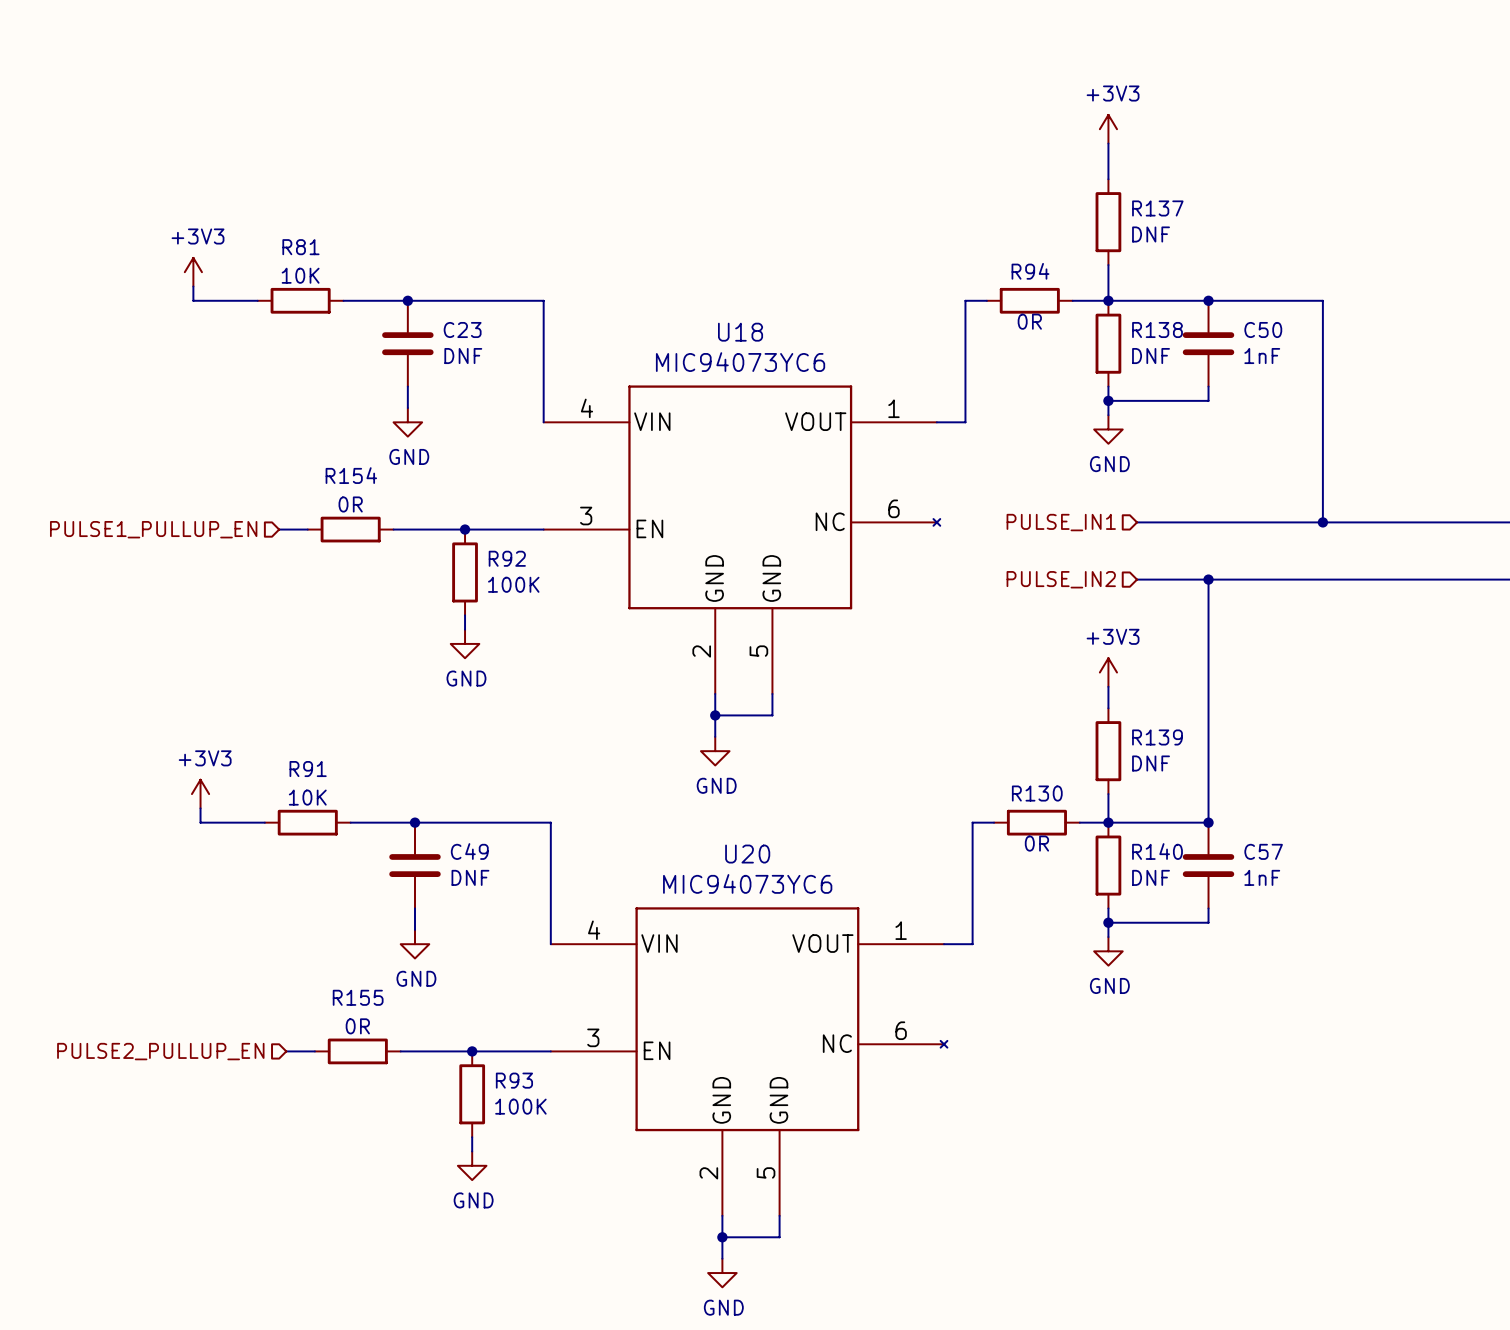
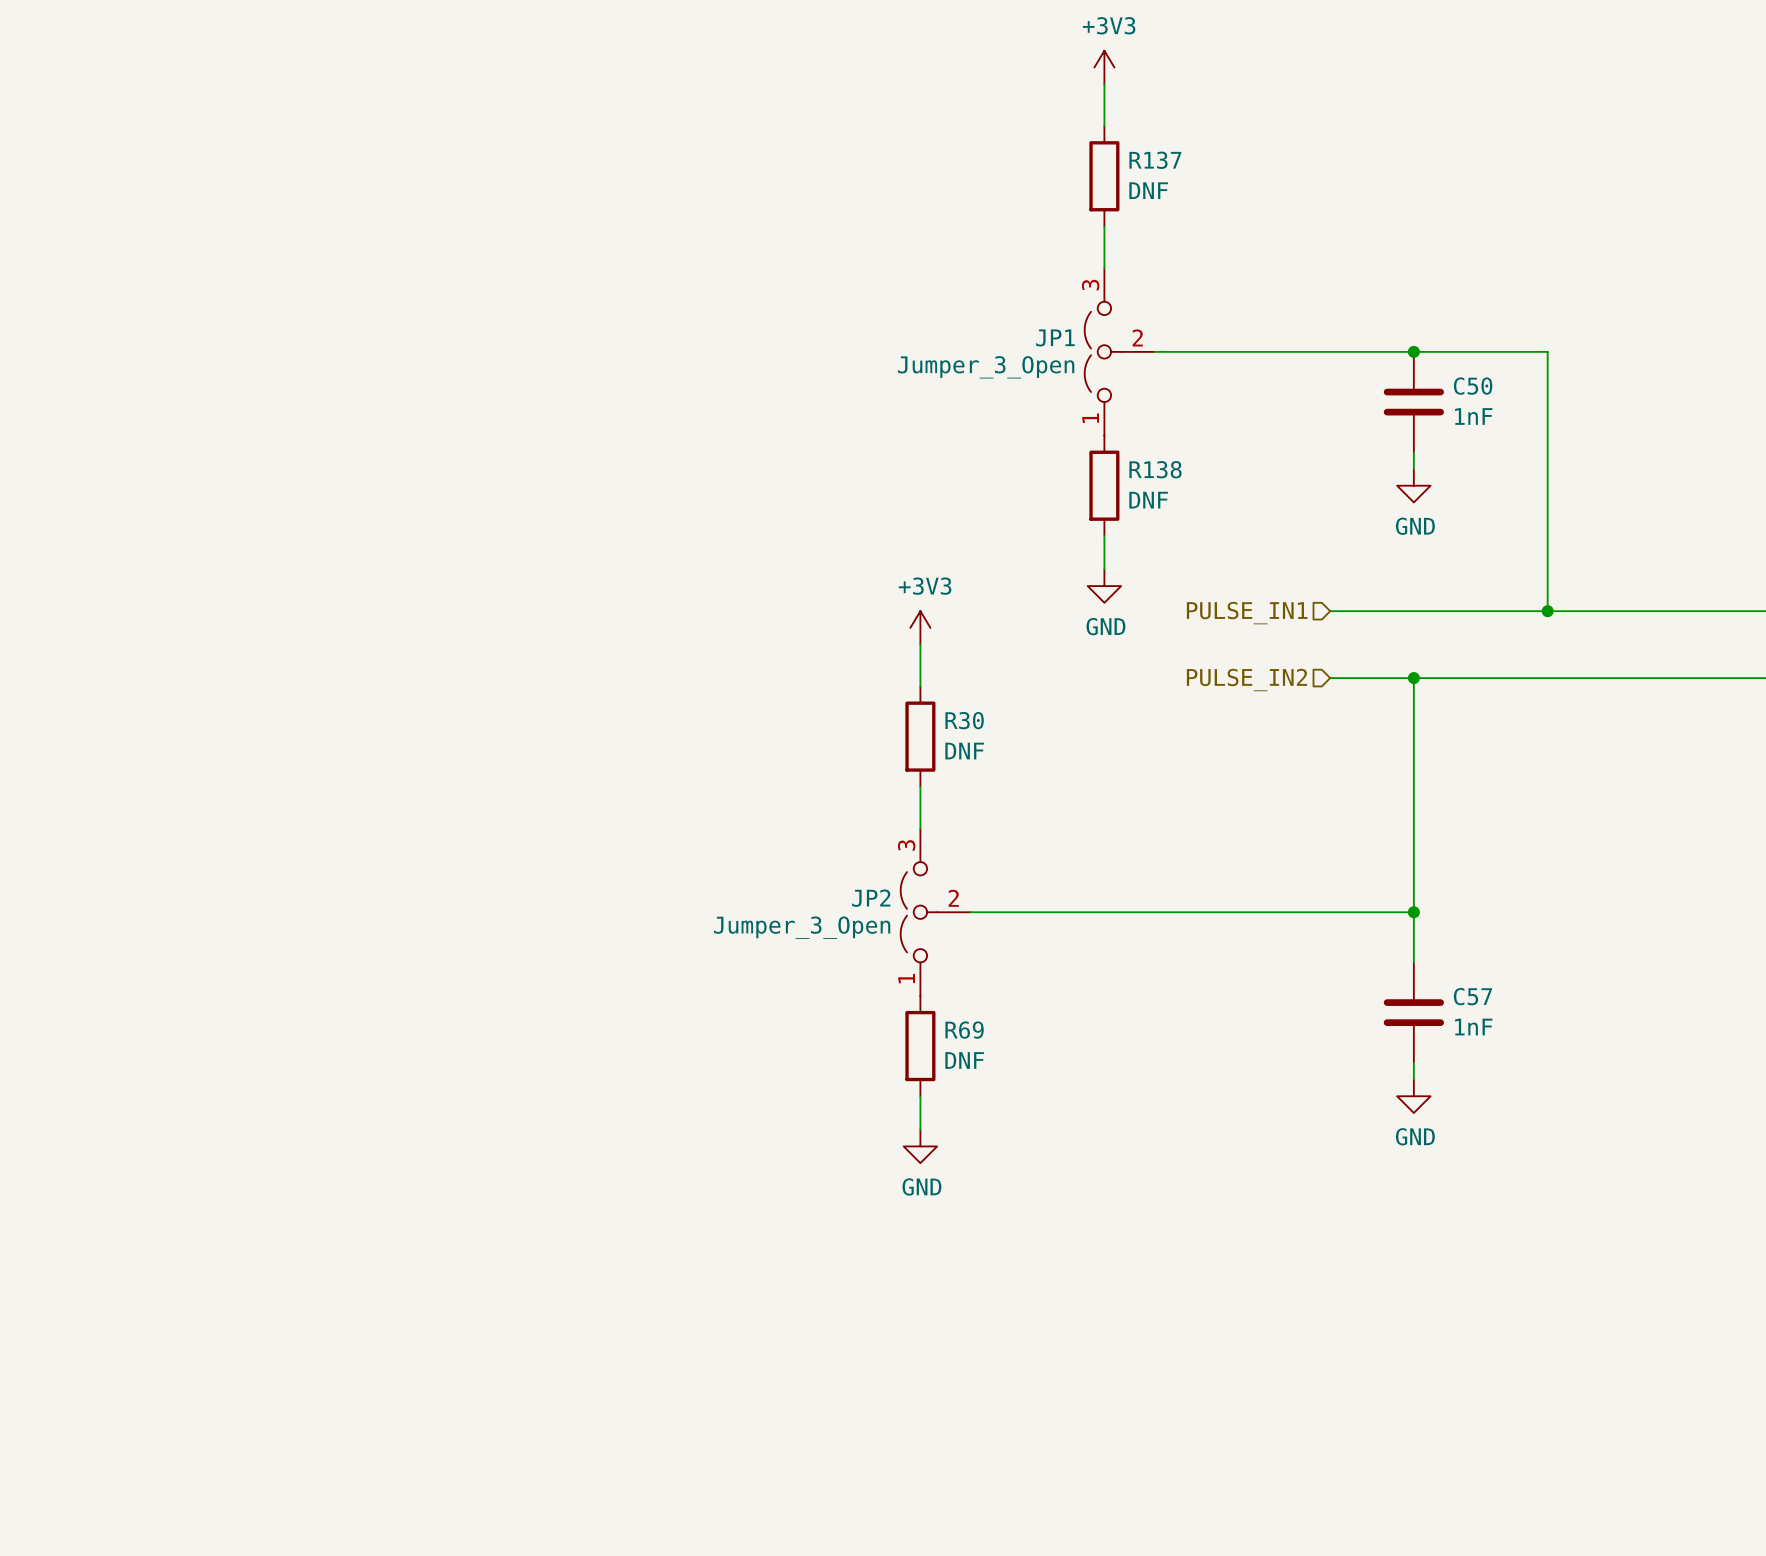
power symbol position: +3V3 (1108, 129) -> +3V3 (1104, 67)
wire: (1108, 143) (1108, 179) -> (1104, 84) (1104, 126)
R137 position: (1108, 222) -> (1104, 176)
wire: (1108, 265) (1108, 300) -> (1104, 226) (1104, 268)
power symbol: +3V3 (193, 272) -> none
wire: (193, 286) (193, 300) (257, 300) -> none
R81: 10K (300, 300) -> none
wire: (343, 300) (543, 300) (543, 422) -> none
junction: (407, 300) -> none
JP1: none -> Jumper_3_Open (1119, 351)
wire: (986, 300) (965, 300) (965, 422) (936, 422) -> (1154, 351) (1254, 351)
R94: 0R (1029, 300) -> none
junction: (1108, 300) -> none
C23: DNF (407, 343) -> none
R138 position: (1108, 343) -> (1104, 485)
wire: (407, 386) (407, 408) -> none
wire: (1108, 386) (1108, 415) -> (1104, 535) (1104, 569)
wire: (1108, 400) (1208, 400) -> none
junction: (1108, 400) -> none
power symbol: none -> GND (1413, 485)
power symbol: GND (407, 422) -> none
power symbol: GND (1108, 429) -> none
power symbol: none -> GND (1104, 586)
hierarchical label: PULSE1_PULLUP_EN (153, 529) -> none
wire: (279, 529) (307, 529) -> none
R154: 0R (350, 529) -> none
wire: (393, 529) (543, 529) -> none
junction: (465, 529) -> none
power symbol: none -> +3V3 (920, 627)
U18: MIC94073YC6 (741, 539) -> none
wire: none -> (920, 644) (920, 686)
R92: 100K (465, 572) -> none
wire: (465, 615) (465, 629) -> none
R30: none -> DNF (920, 736)
power symbol: GND (465, 643) -> none
wire: none -> (920, 786) (920, 828)
power symbol: +3V3 (1108, 672) -> none
wire: (1108, 686) (1108, 708) -> none
wire: (715, 693) (715, 736) -> none
wire: (772, 693) (772, 715) (715, 715) -> none
junction: (715, 715) -> none
power symbol: GND (715, 751) -> none
R139: DNF (1108, 751) -> none
JP2: none -> Jumper_3_Open (935, 912)
wire: none -> (970, 912) (1413, 912)
power symbol: +3V3 (200, 794) -> none
wire: (1108, 794) (1108, 822) -> none
wire: (200, 808) (200, 822) (264, 822) -> none
R91: 10K (307, 822) -> none
wire: (350, 822) (550, 822) (550, 944) -> none
junction: (415, 822) -> none
wire: (994, 822) (972, 822) (972, 944) (944, 944) -> none
R130: 0R (1036, 822) -> none
wire: (1079, 822) (1208, 822) -> none
junction: (1108, 822) -> none
junction position: (1208, 822) -> (1413, 912)
C49: DNF (415, 865) -> none
R140: DNF (1108, 865) -> none
R69: none -> DNF (920, 1046)
wire: (415, 908) (415, 929) -> none
wire: (1108, 908) (1108, 937) -> none
wire: (1108, 922) (1208, 922) -> none
junction: (1108, 922) -> none
wire: none -> (920, 1096) (920, 1129)
power symbol: GND (415, 944) -> none
power symbol position: GND (1108, 951) -> GND (1413, 1096)
power symbol: none -> GND (920, 1146)
hierarchical label: PULSE2_PULLUP_EN (160, 1051) -> none
wire: (286, 1051) (314, 1051) -> none
R155: 0R (357, 1051) -> none
wire: (400, 1051) (550, 1051) -> none
junction: (472, 1051) -> none
U20: MIC94073YC6 (749, 1061) -> none
R93: 100K (472, 1094) -> none
wire: (472, 1137) (472, 1151) -> none
power symbol: GND (472, 1165) -> none
wire: (722, 1215) (722, 1258) -> none
wire: (779, 1215) (779, 1237) (722, 1237) -> none
junction: (722, 1237) -> none
power symbol: GND (722, 1273) -> none

